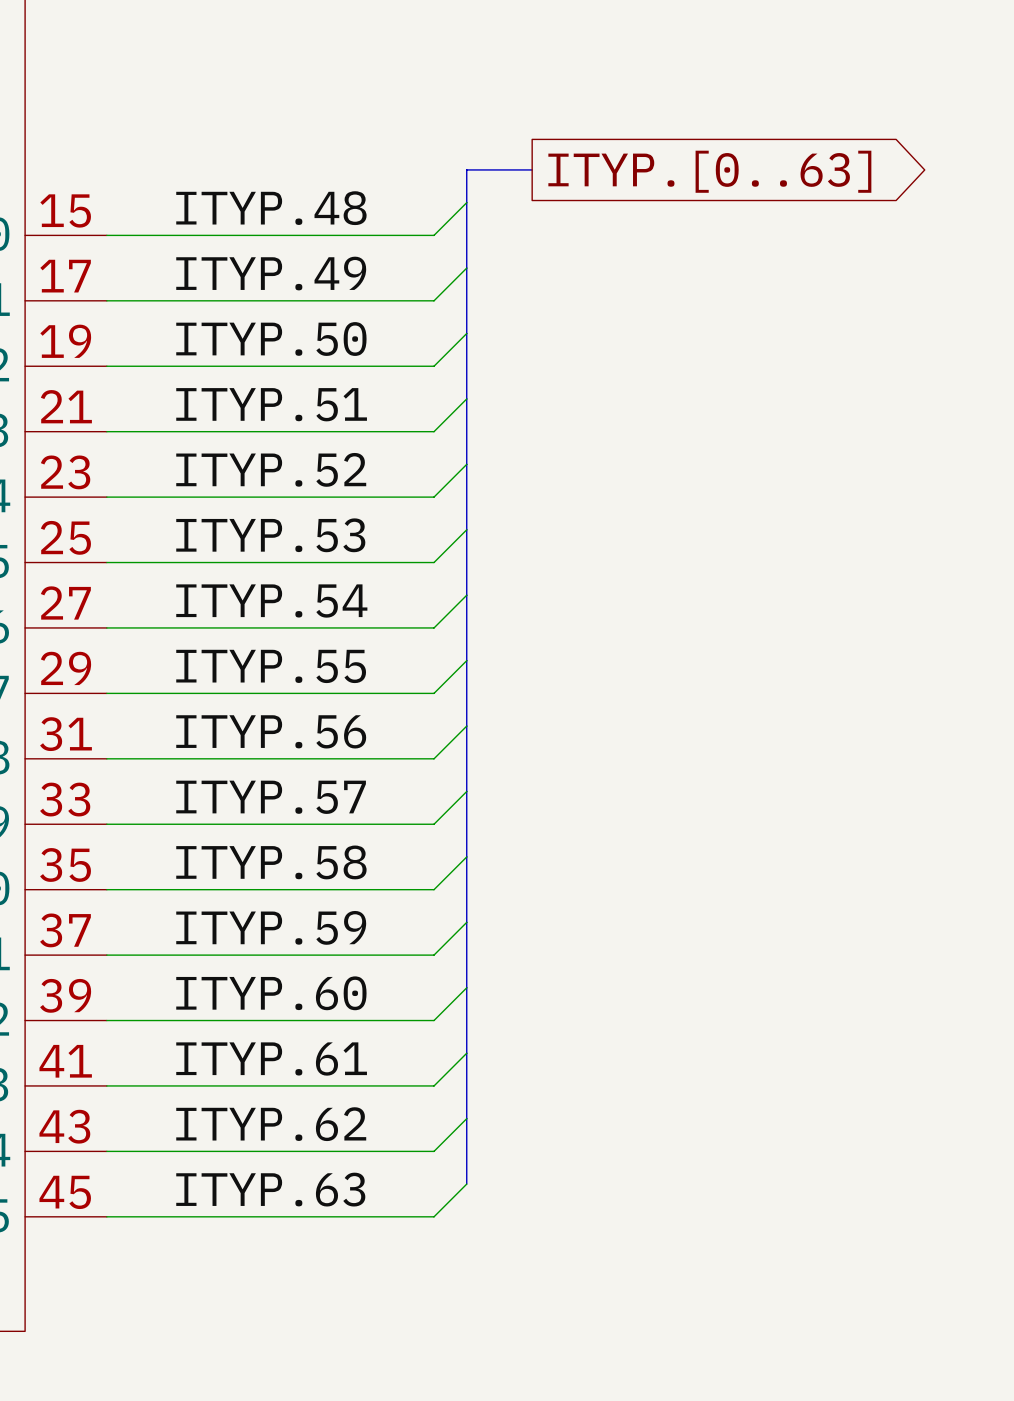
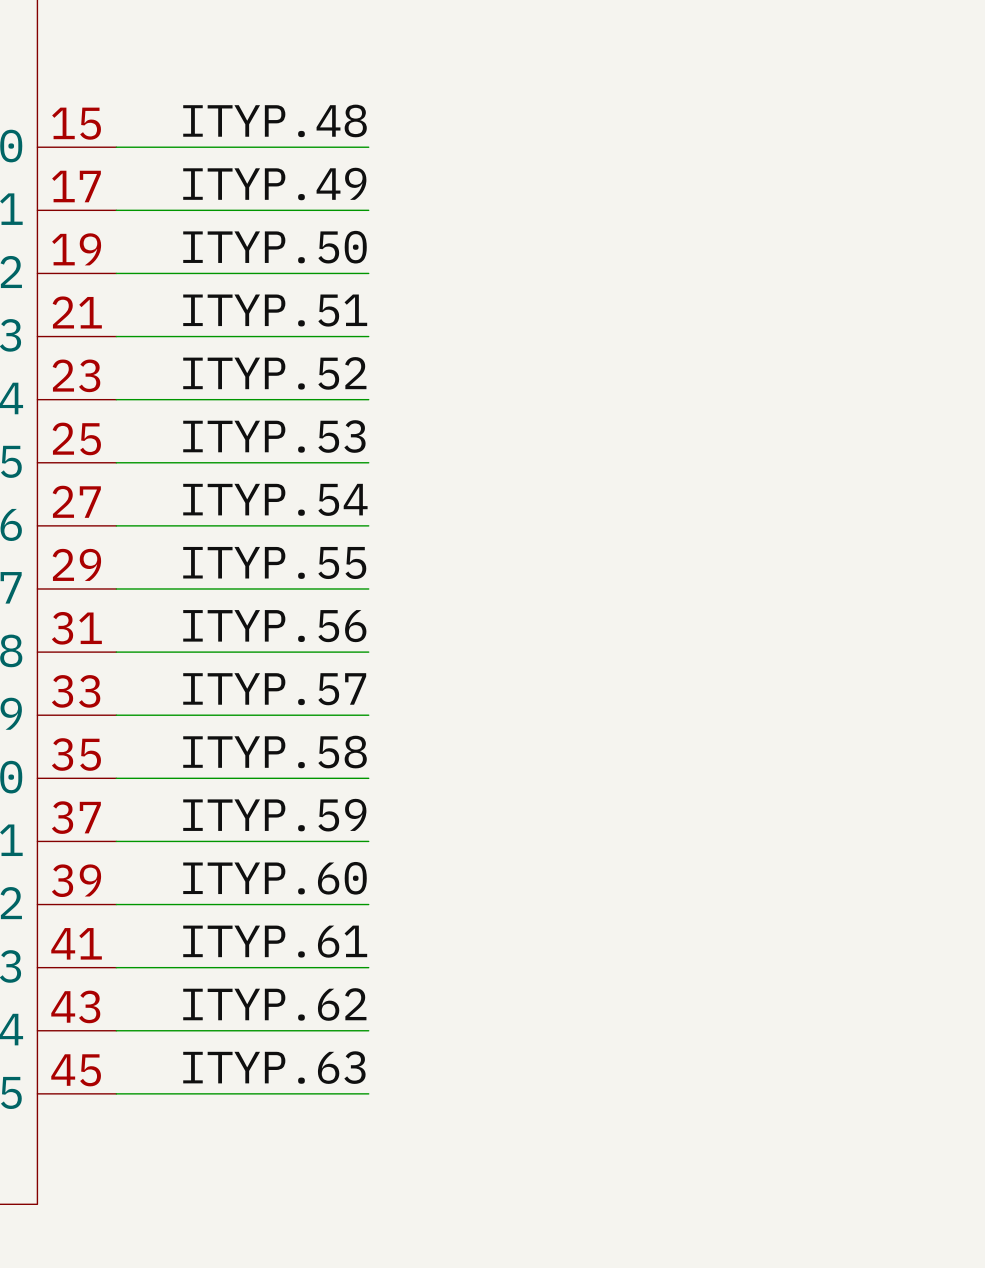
bus: (532, 169) (466, 169) (466, 1184) -> none
global label: ITYP.[0..63] (709, 171) -> none
wire: (466, 202) (434, 235) (368, 235) -> none
wire: (466, 268) (434, 300) (368, 300) -> none
wire: (466, 333) (434, 366) (368, 366) -> none
wire: (466, 398) (434, 431) (368, 431) -> none
wire: (466, 464) (434, 497) (368, 497) -> none
wire: (466, 529) (434, 562) (368, 562) -> none
wire: (466, 595) (434, 627) (368, 627) -> none
wire: (466, 660) (434, 693) (368, 693) -> none
wire: (466, 726) (434, 758) (368, 758) -> none
wire: (466, 791) (434, 824) (368, 824) -> none
wire: (466, 856) (434, 889) (368, 889) -> none
wire: (466, 922) (434, 955) (368, 955) -> none
wire: (466, 987) (434, 1020) (368, 1020) -> none
wire: (466, 1053) (434, 1085) (368, 1085) -> none
wire: (466, 1118) (434, 1151) (368, 1151) -> none
wire: (466, 1184) (434, 1216) (368, 1216) -> none

